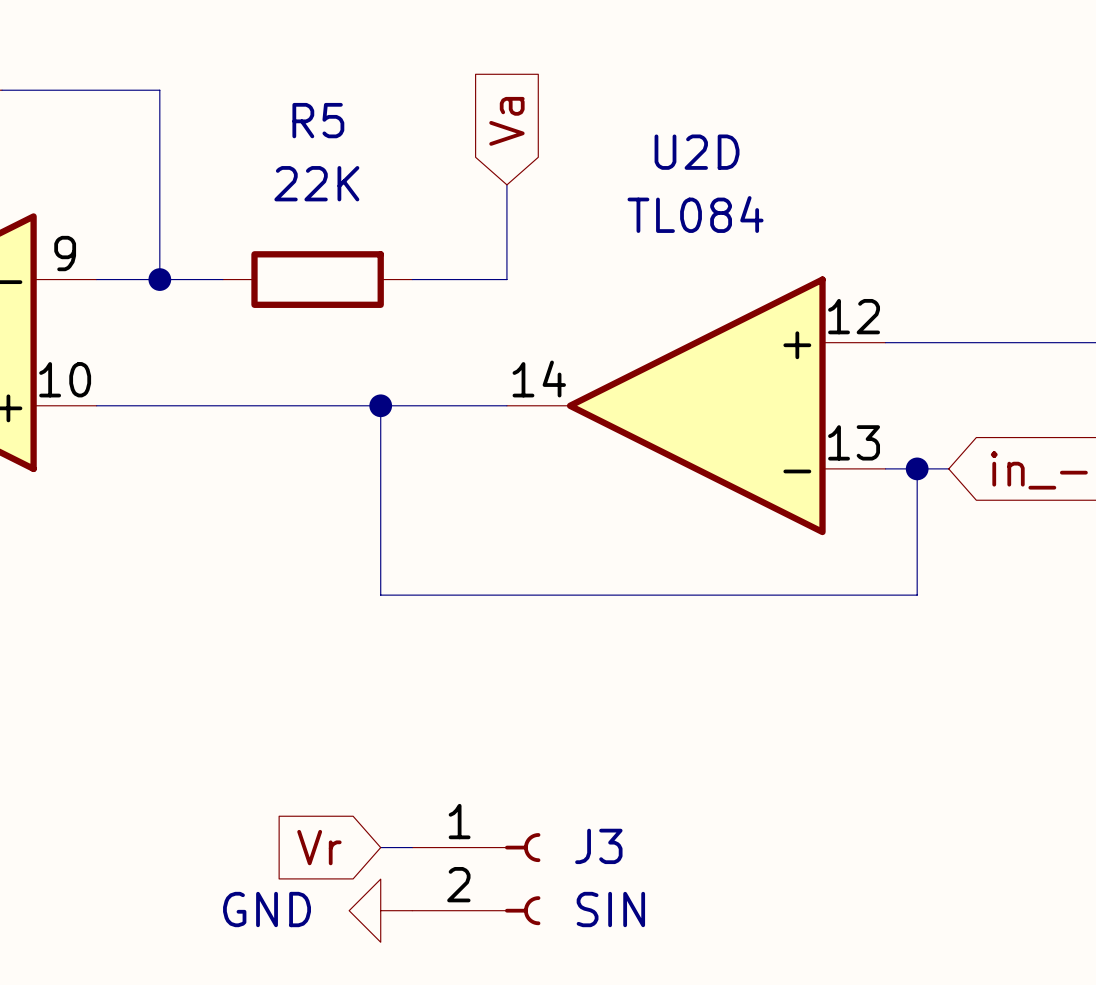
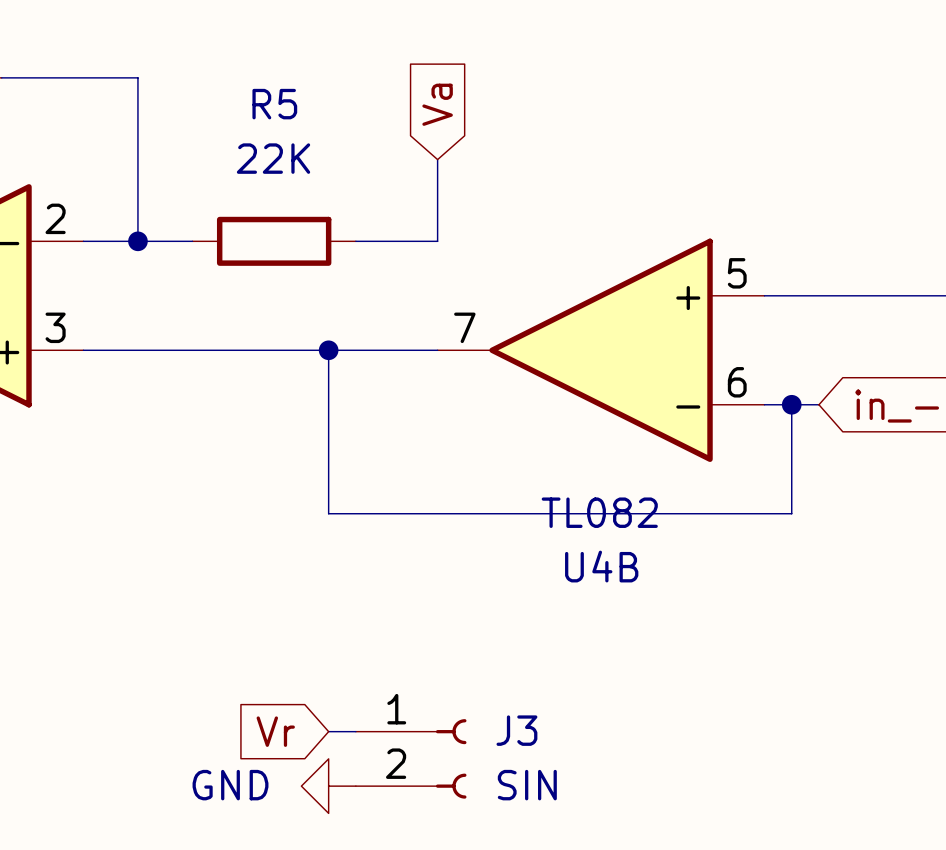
U2D name: U2D (697, 152) -> U4B (601, 566)
U2D value: TL084 (695, 214) -> TL082 (599, 512)
part pin number: 9 (65, 253) -> 2 (55, 218)
U2D pin number: 12 (854, 316) -> 5 (737, 273)
part pin number: 10 (65, 379) -> 3 (55, 327)
U2D pin number: 14 (539, 379) -> 7 (464, 327)
U2D pin number: 13 (854, 442) -> 6 (737, 382)

